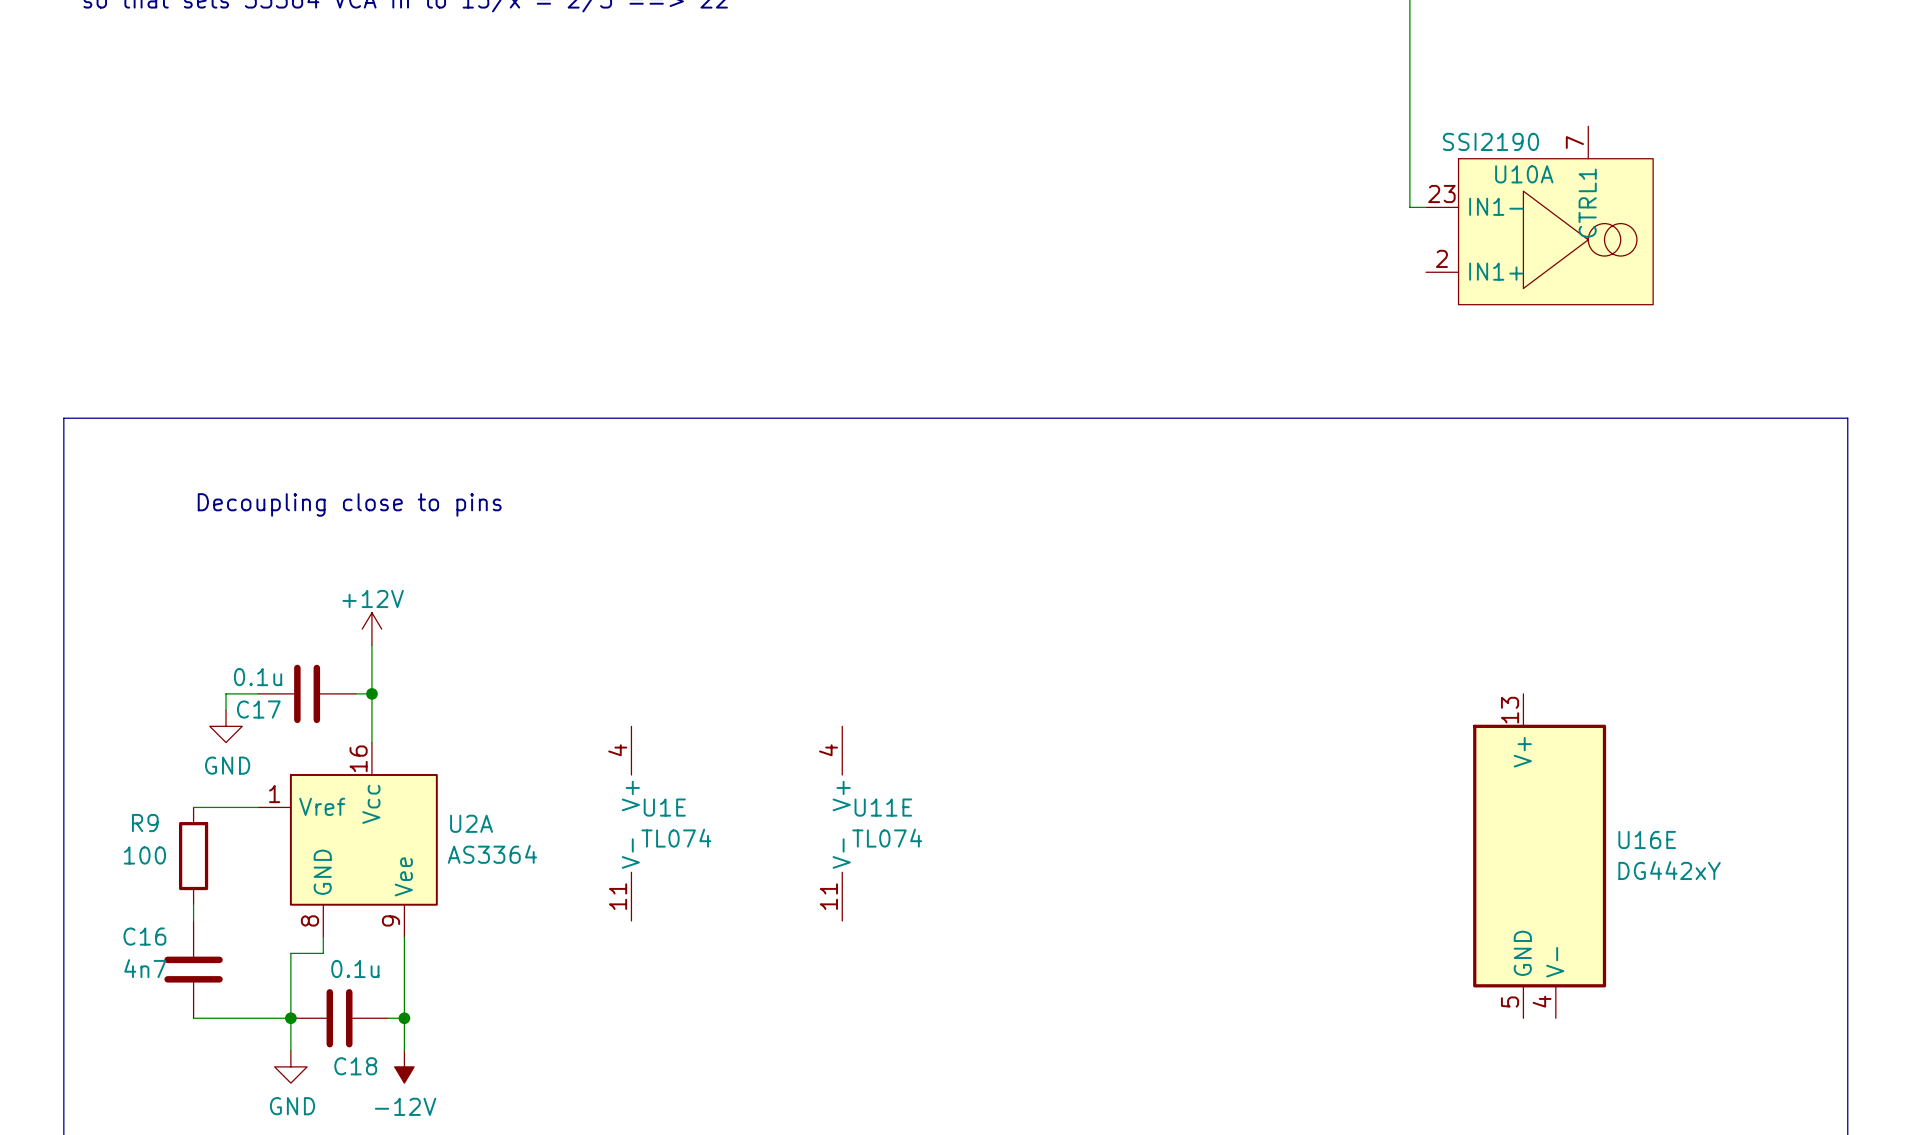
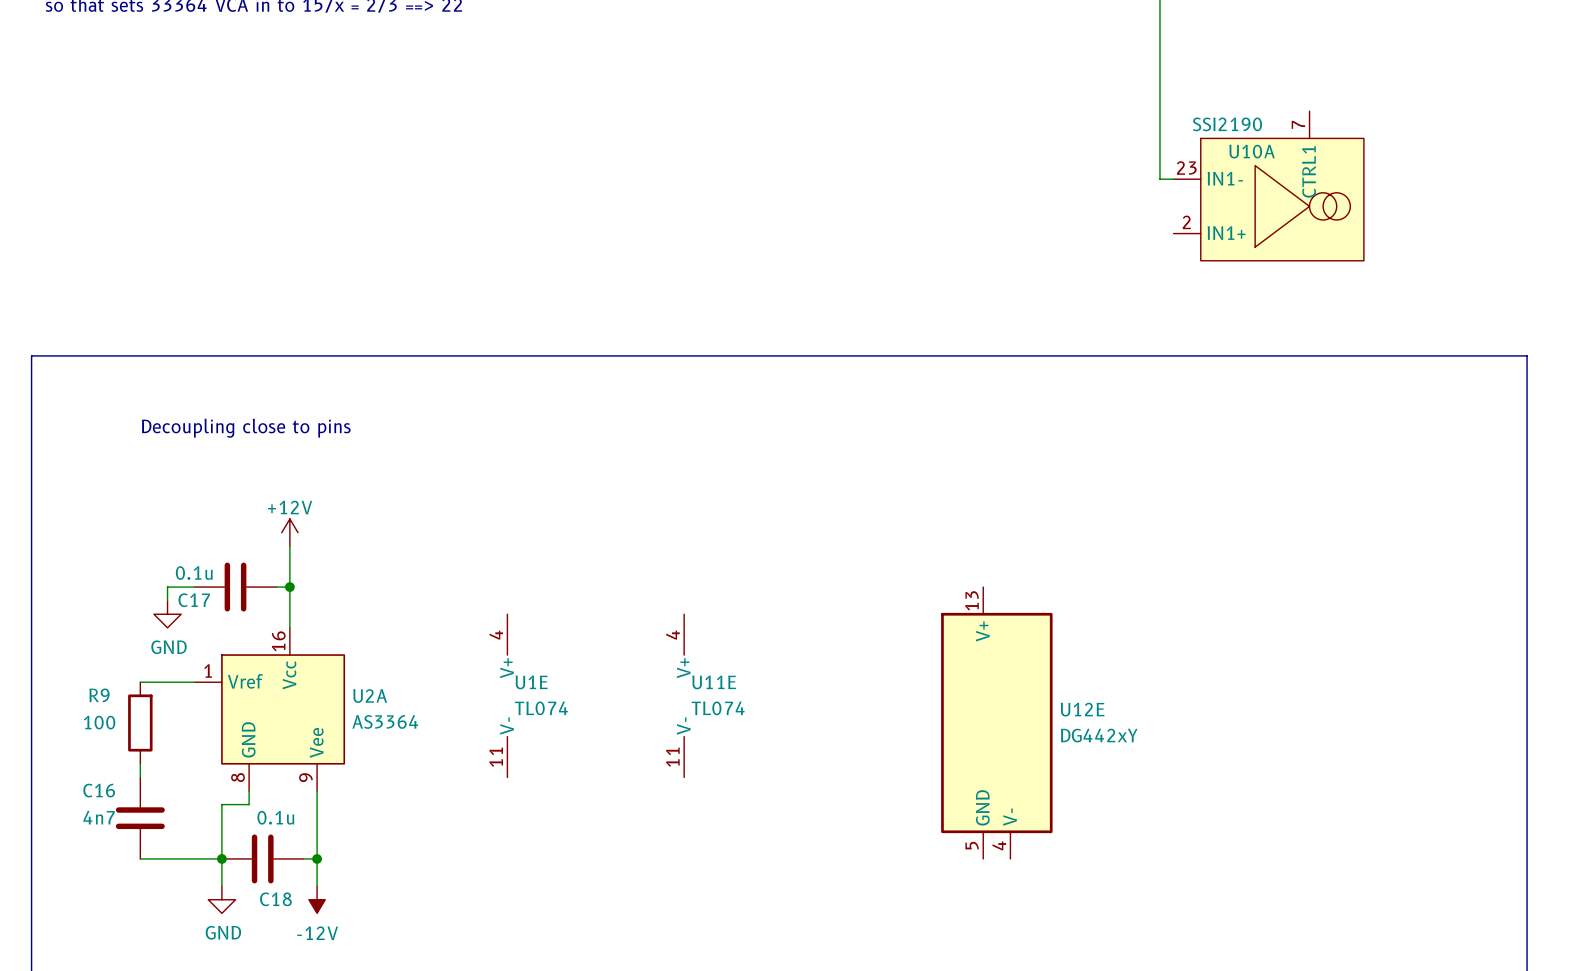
U12E: none -> DG442xY (996, 723)
U16E: DG442xY (1539, 856) -> none

